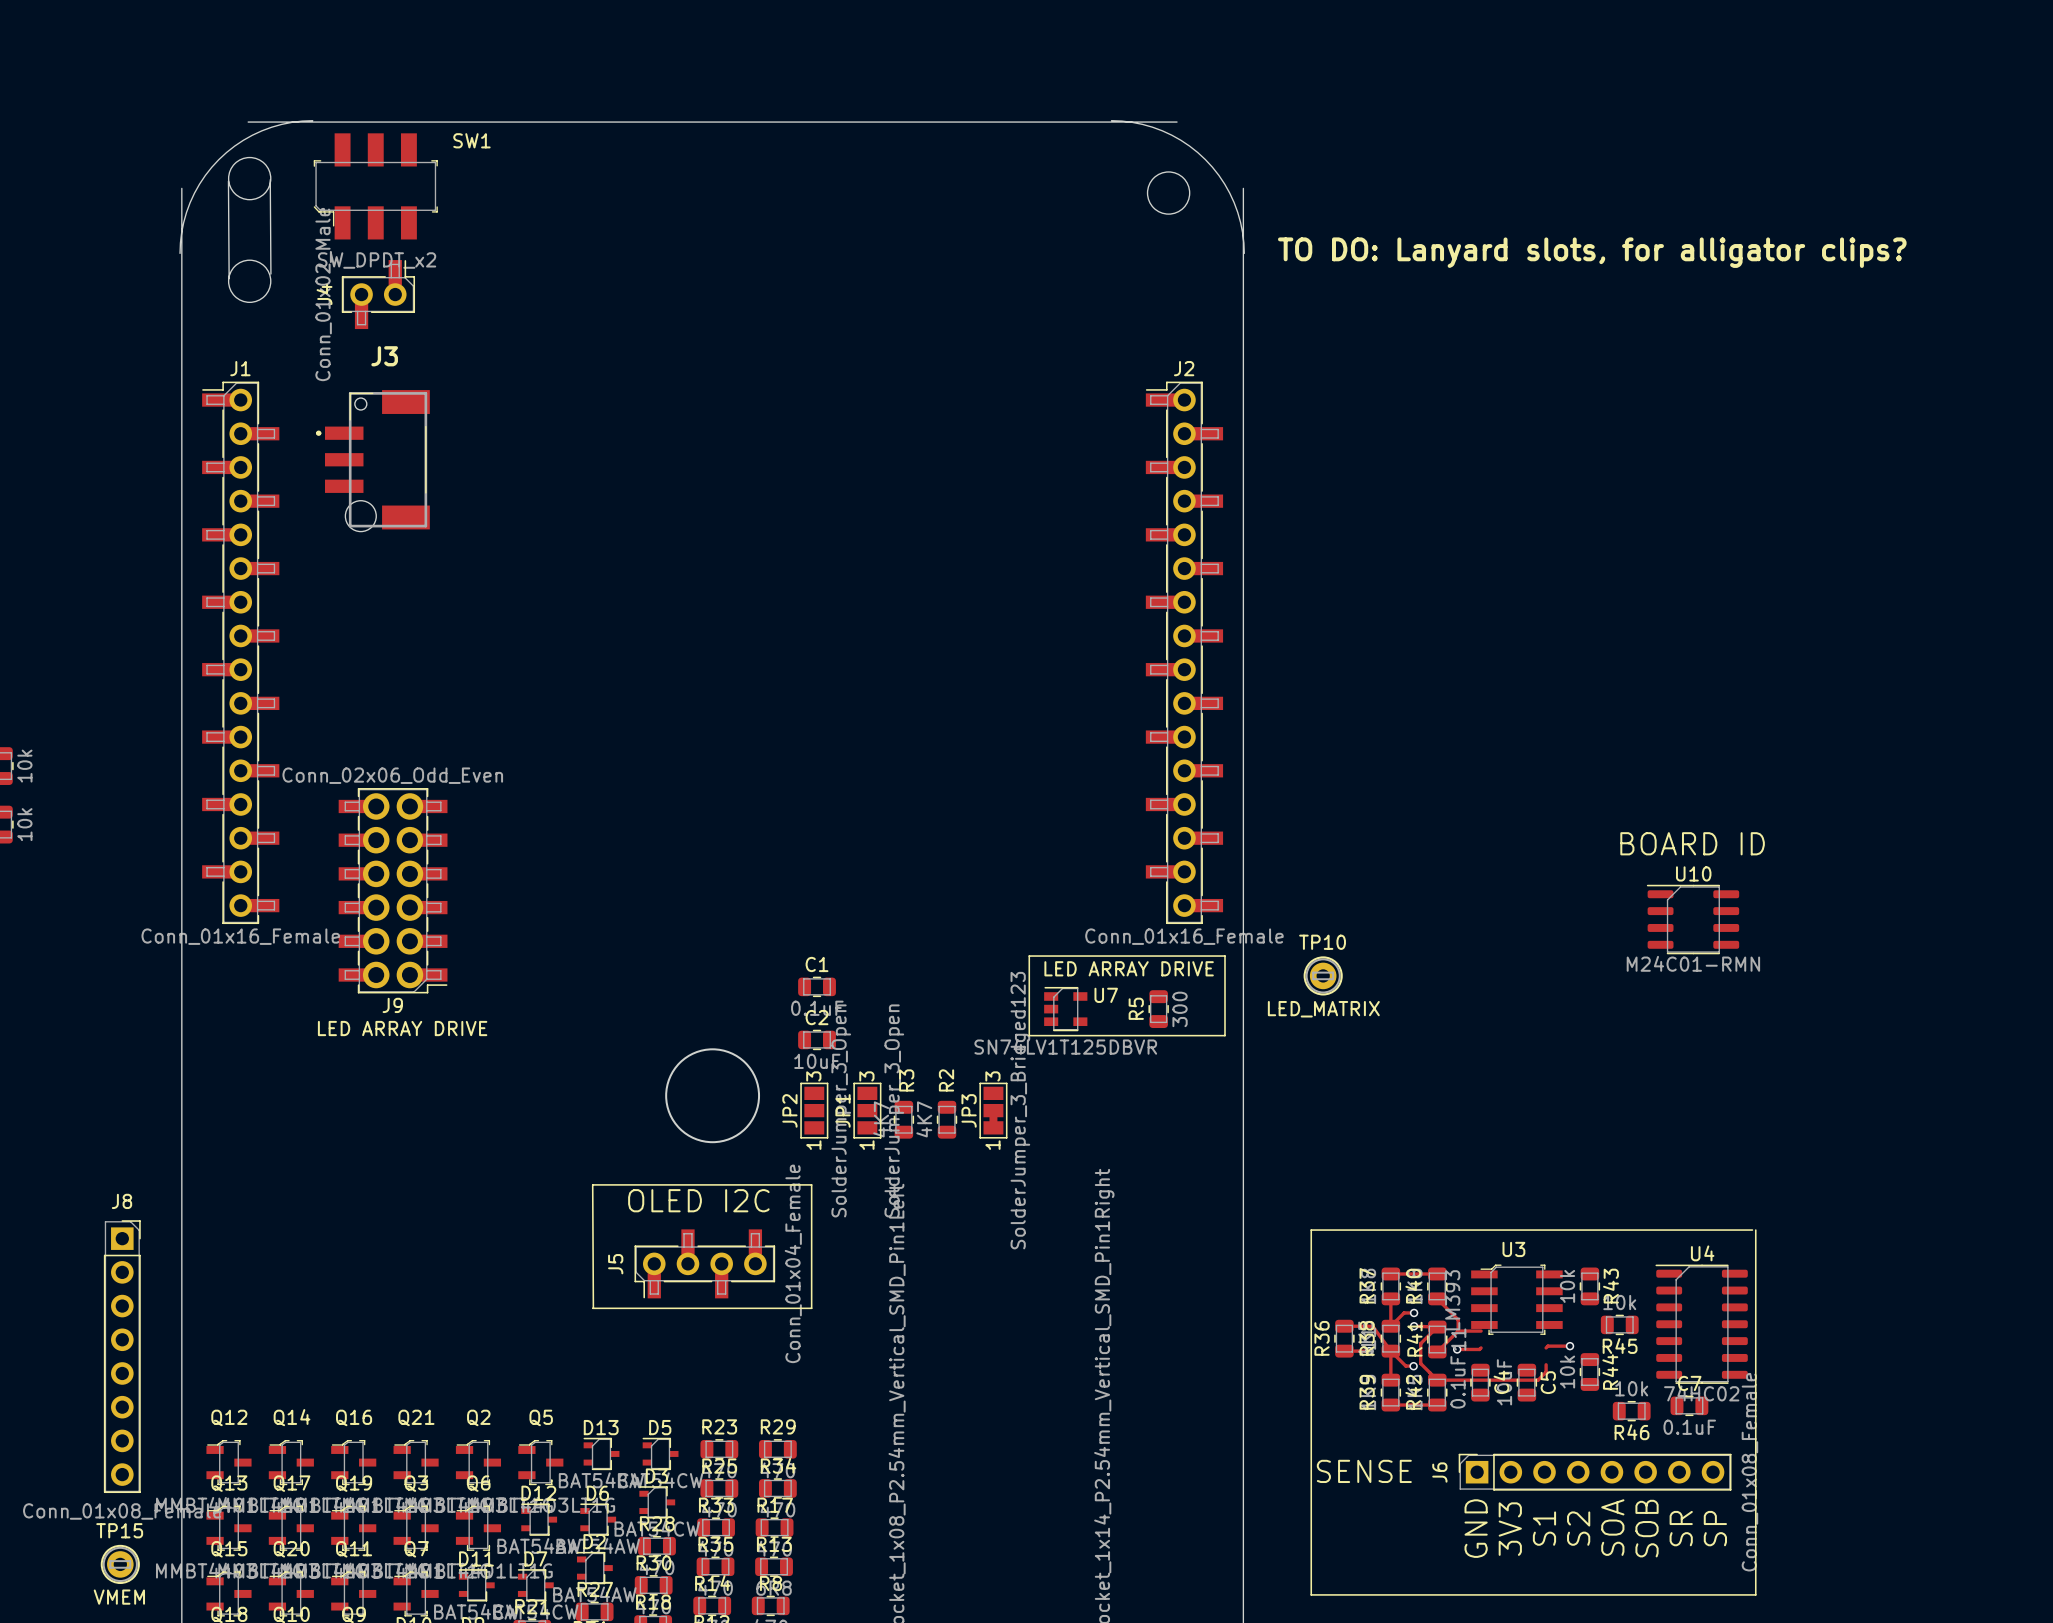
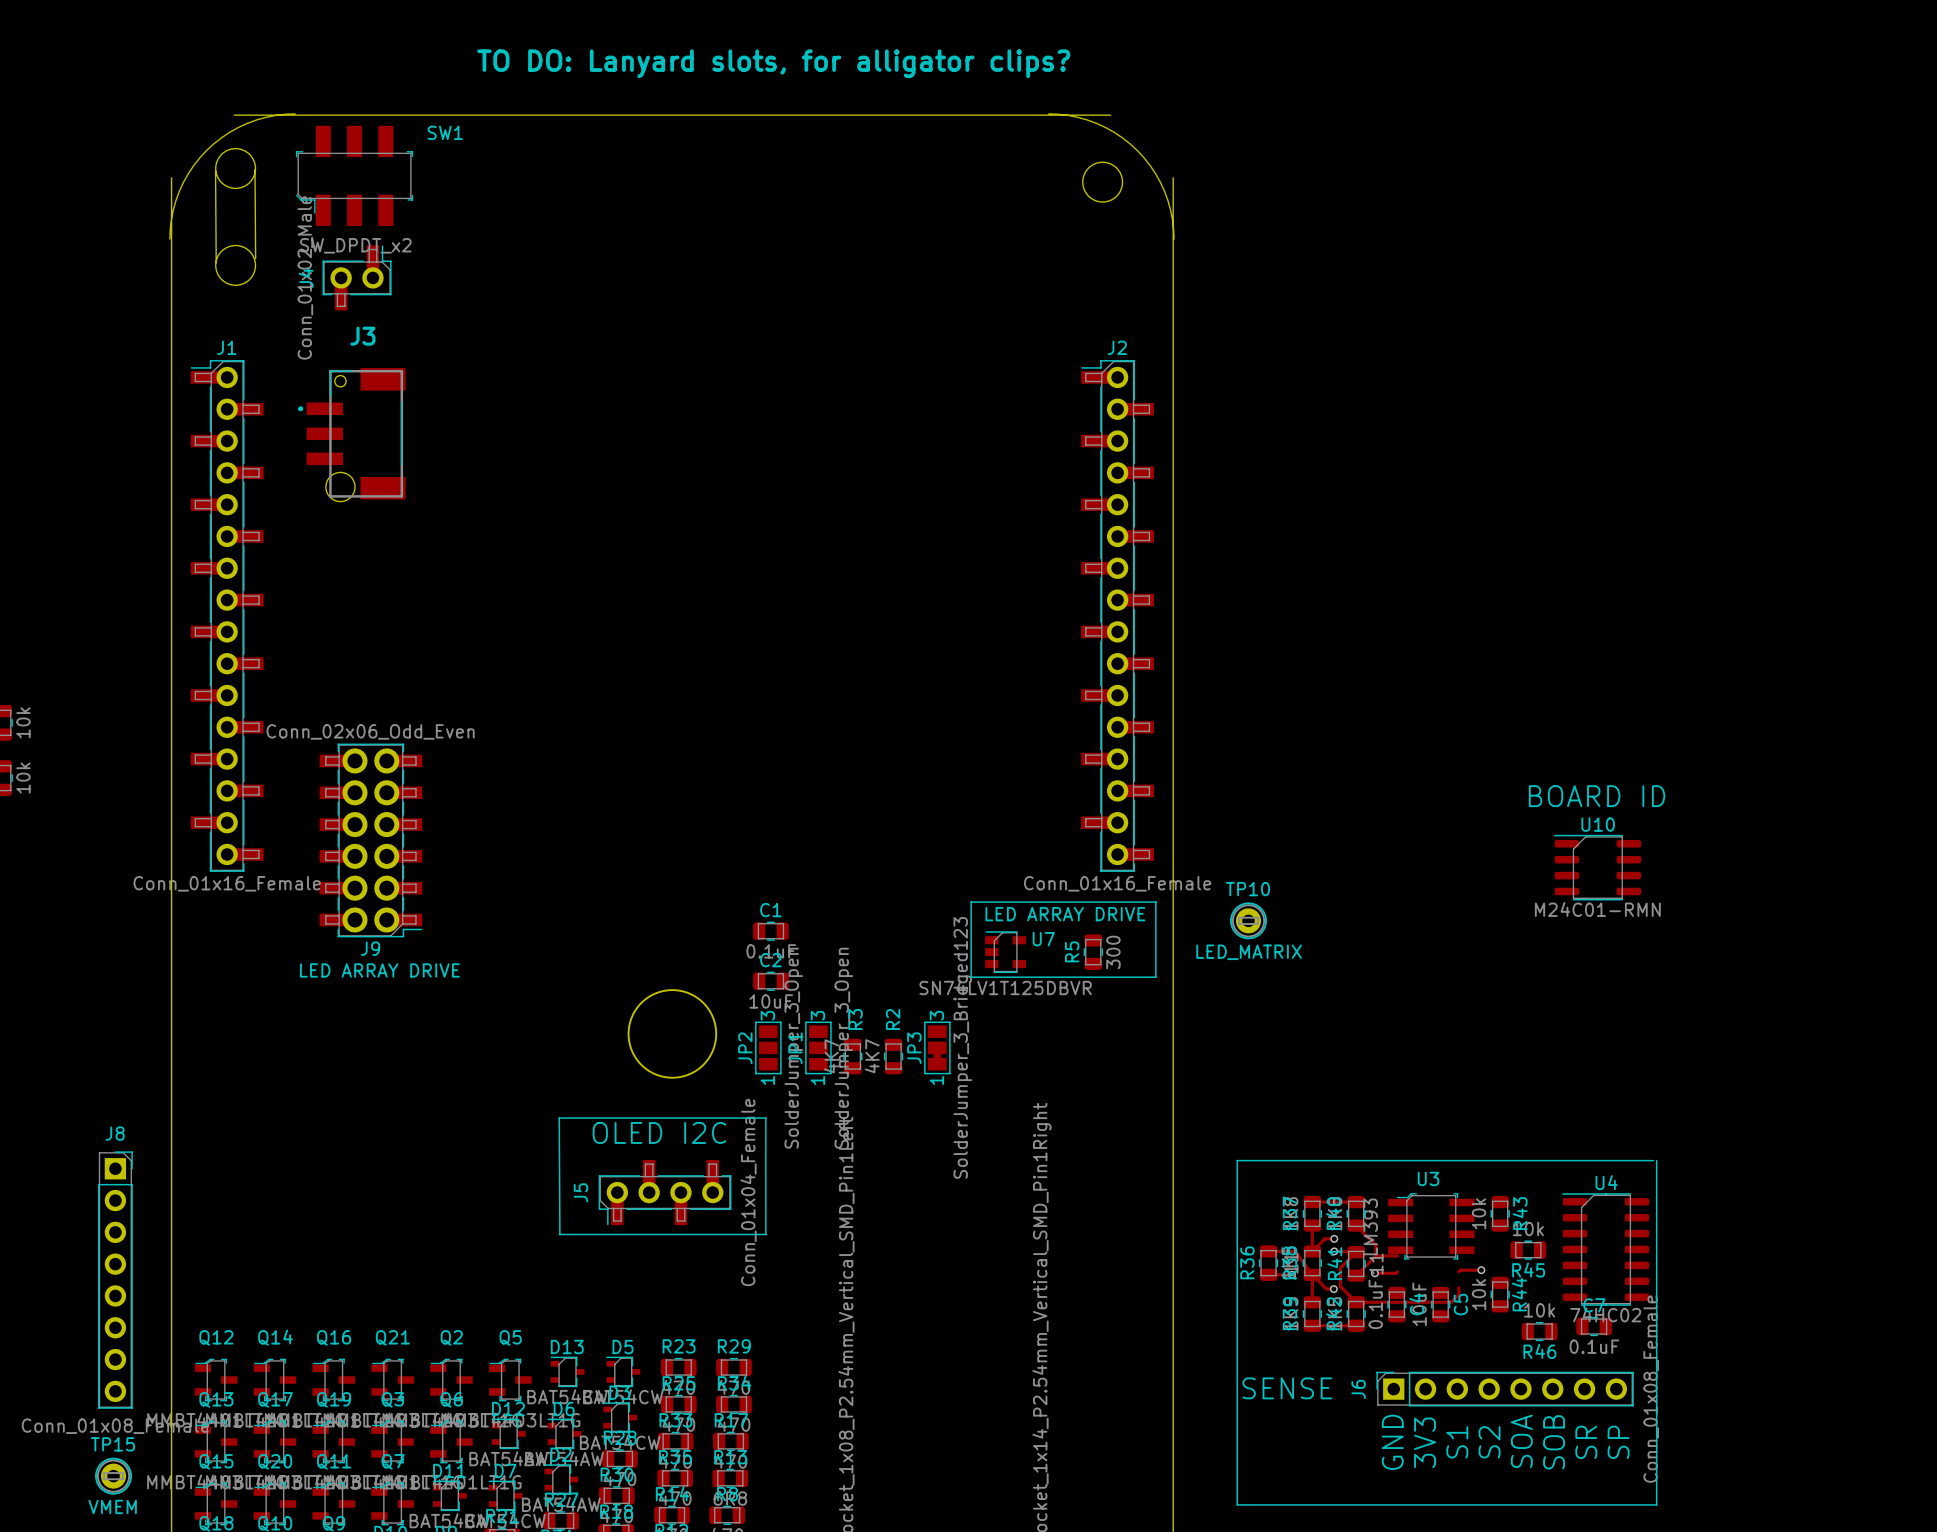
text: none -> TO DO: Lanyard slots, for alligator clips? (773, 63)
text: TO DO: Lanyard slots, for alligator clips? (1592, 252) -> none

